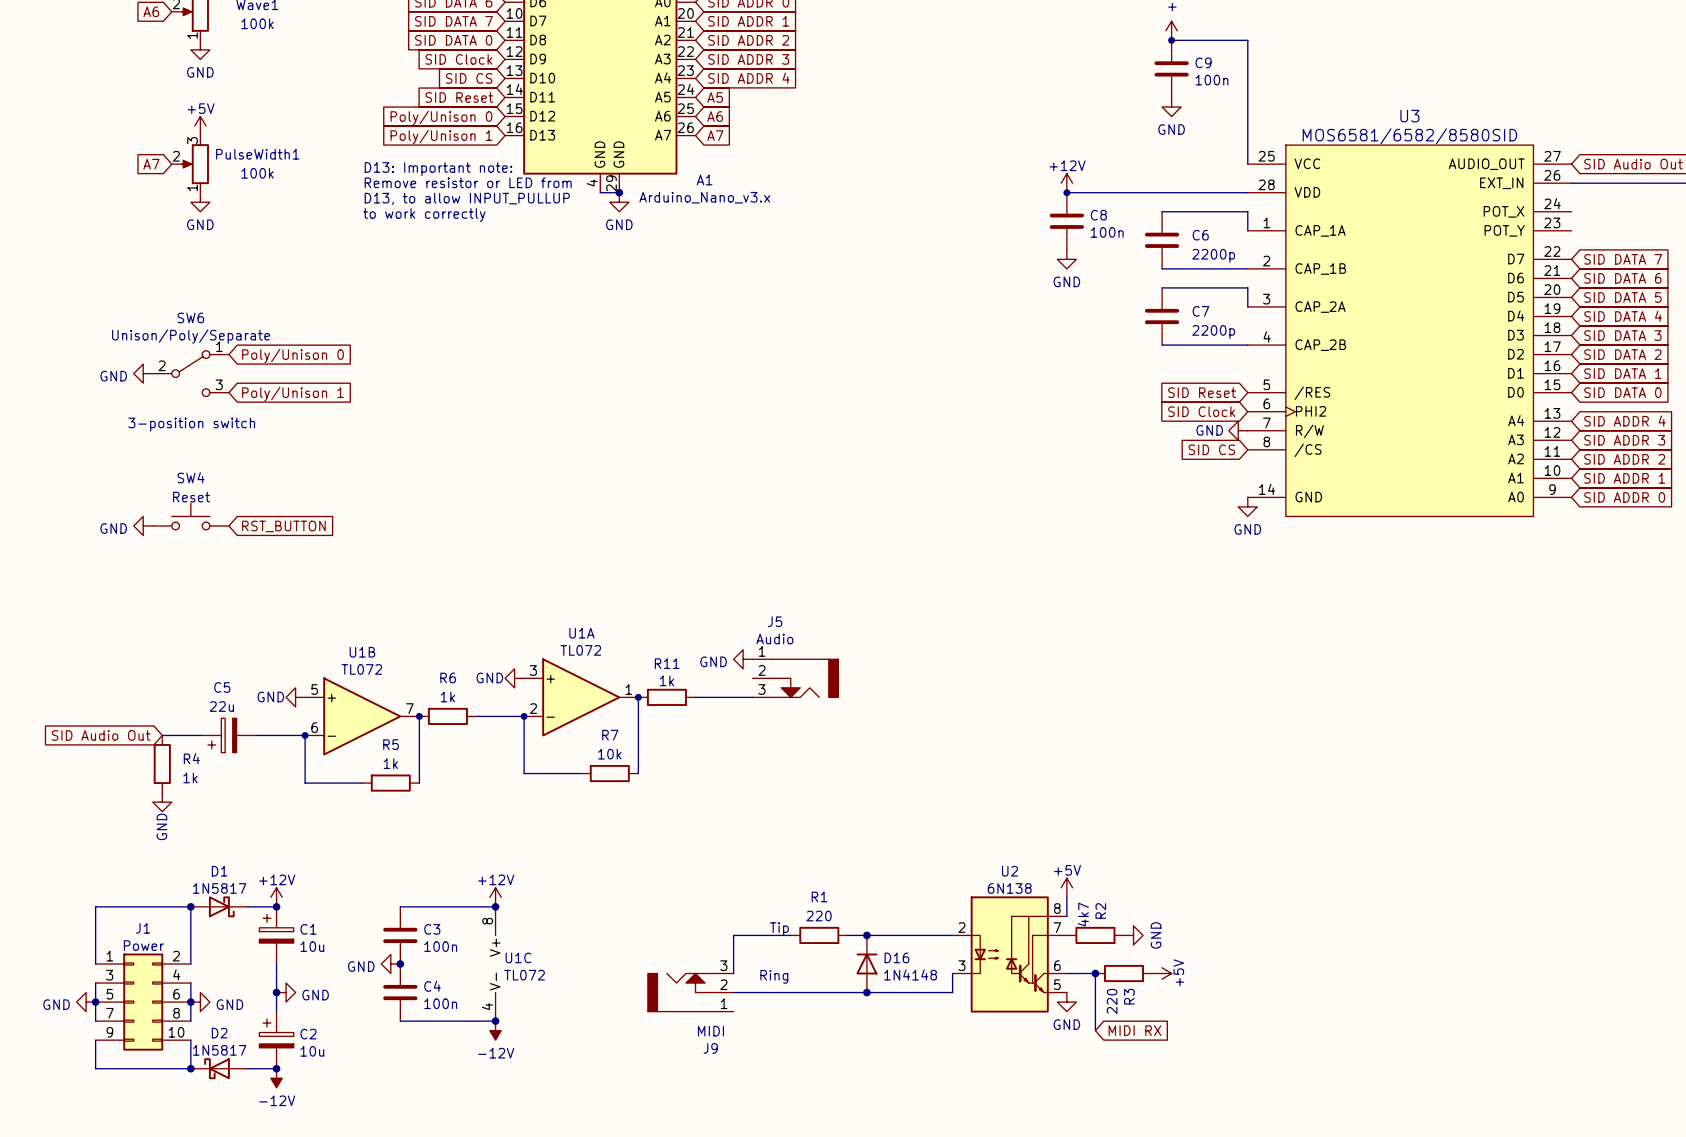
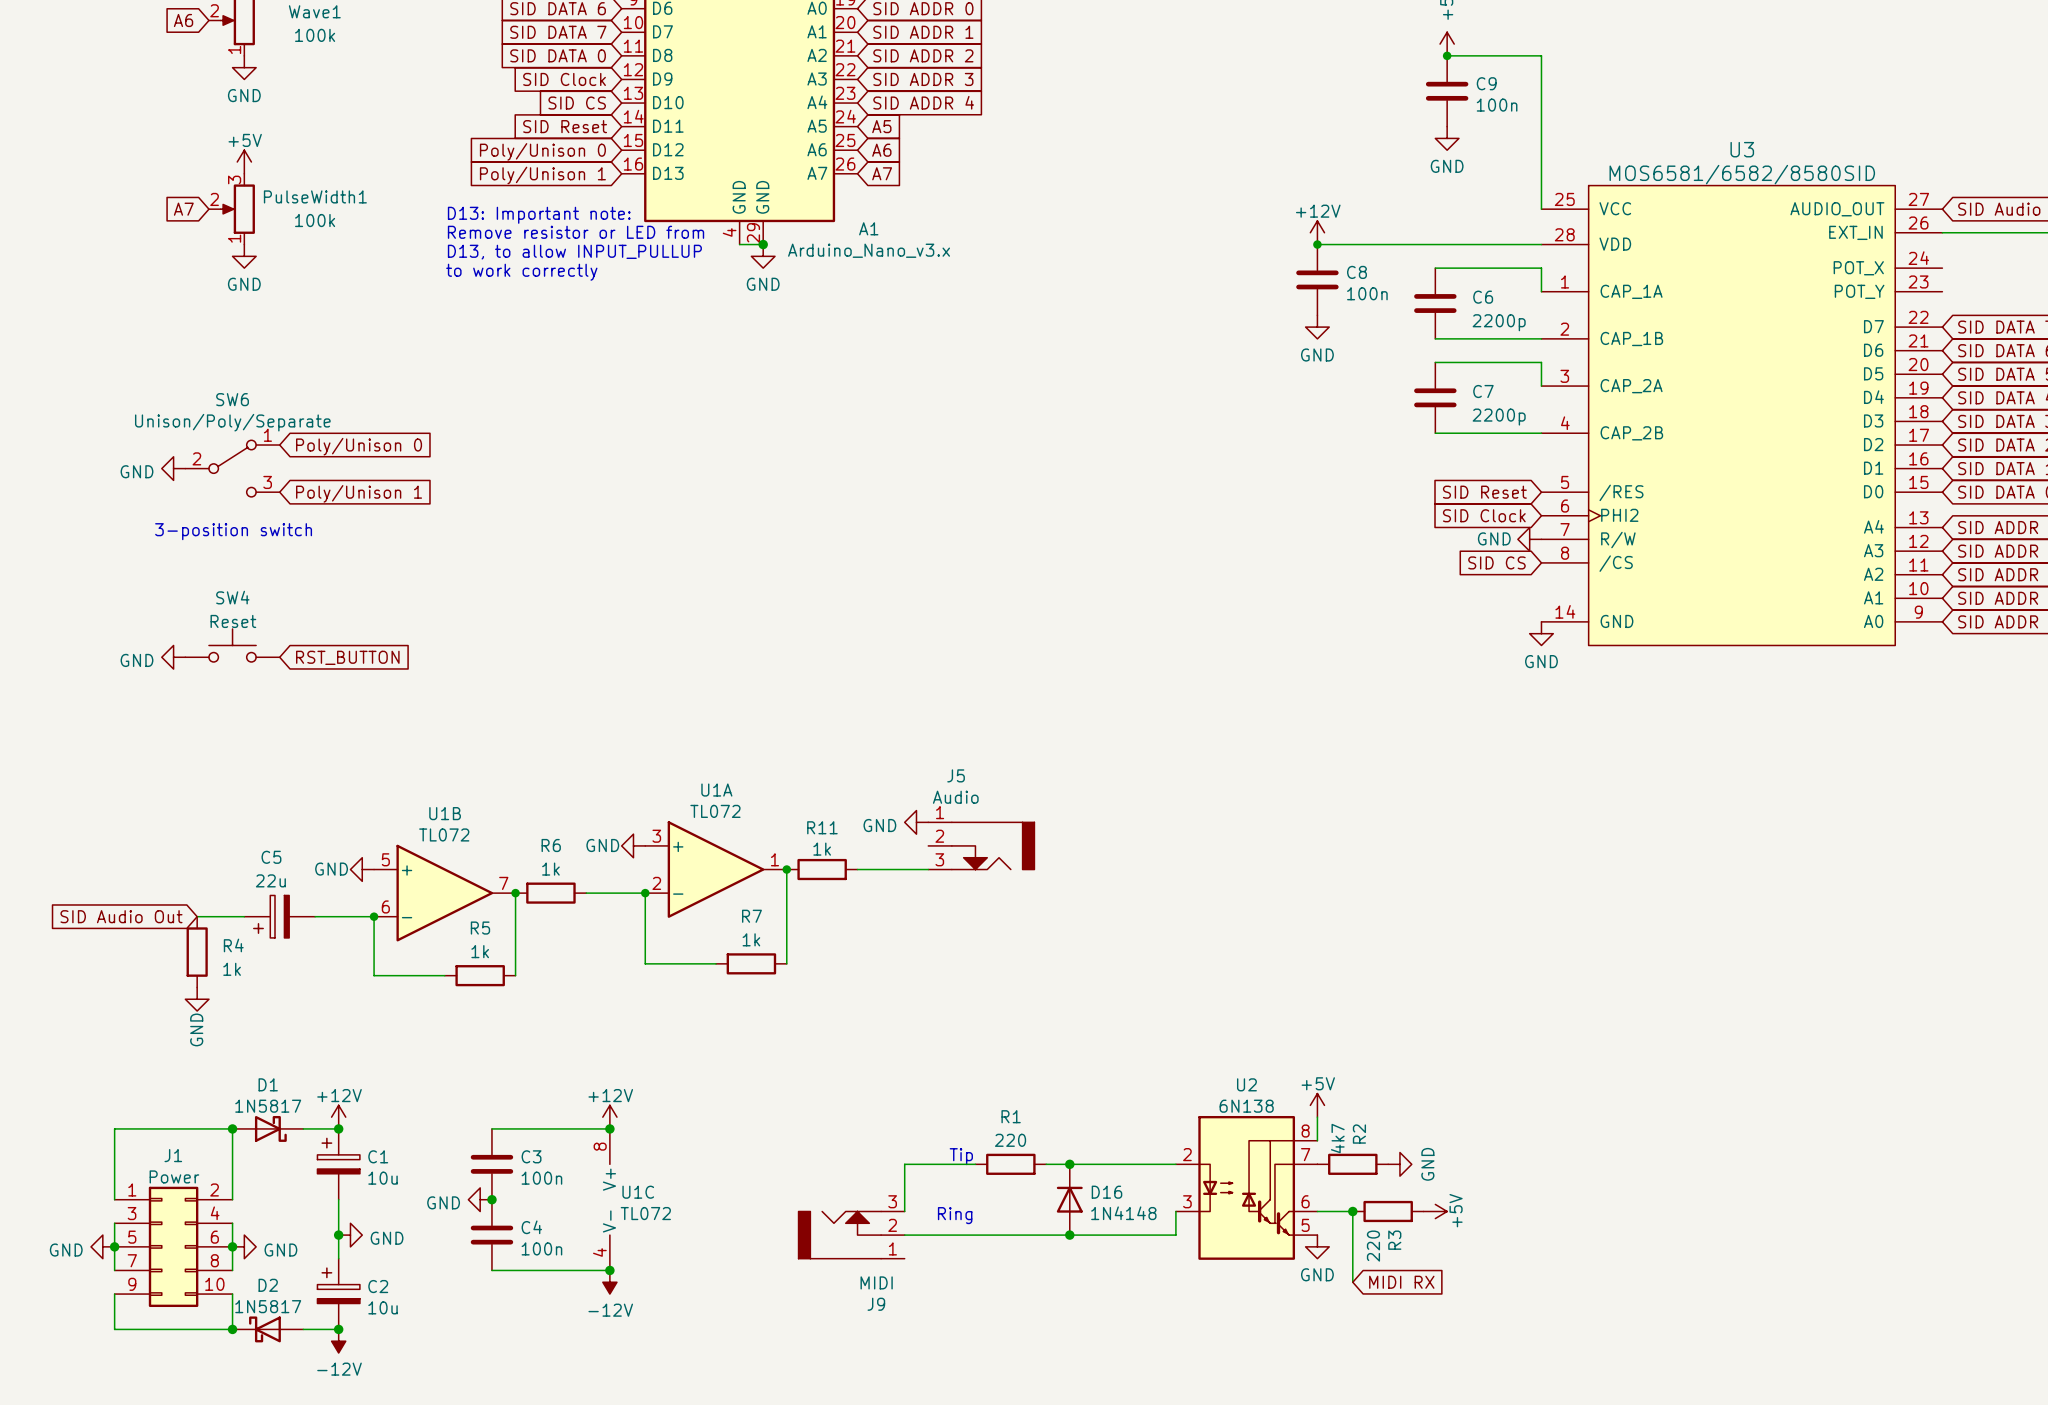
R7 value: 10k (609, 754) -> 1k (751, 939)

